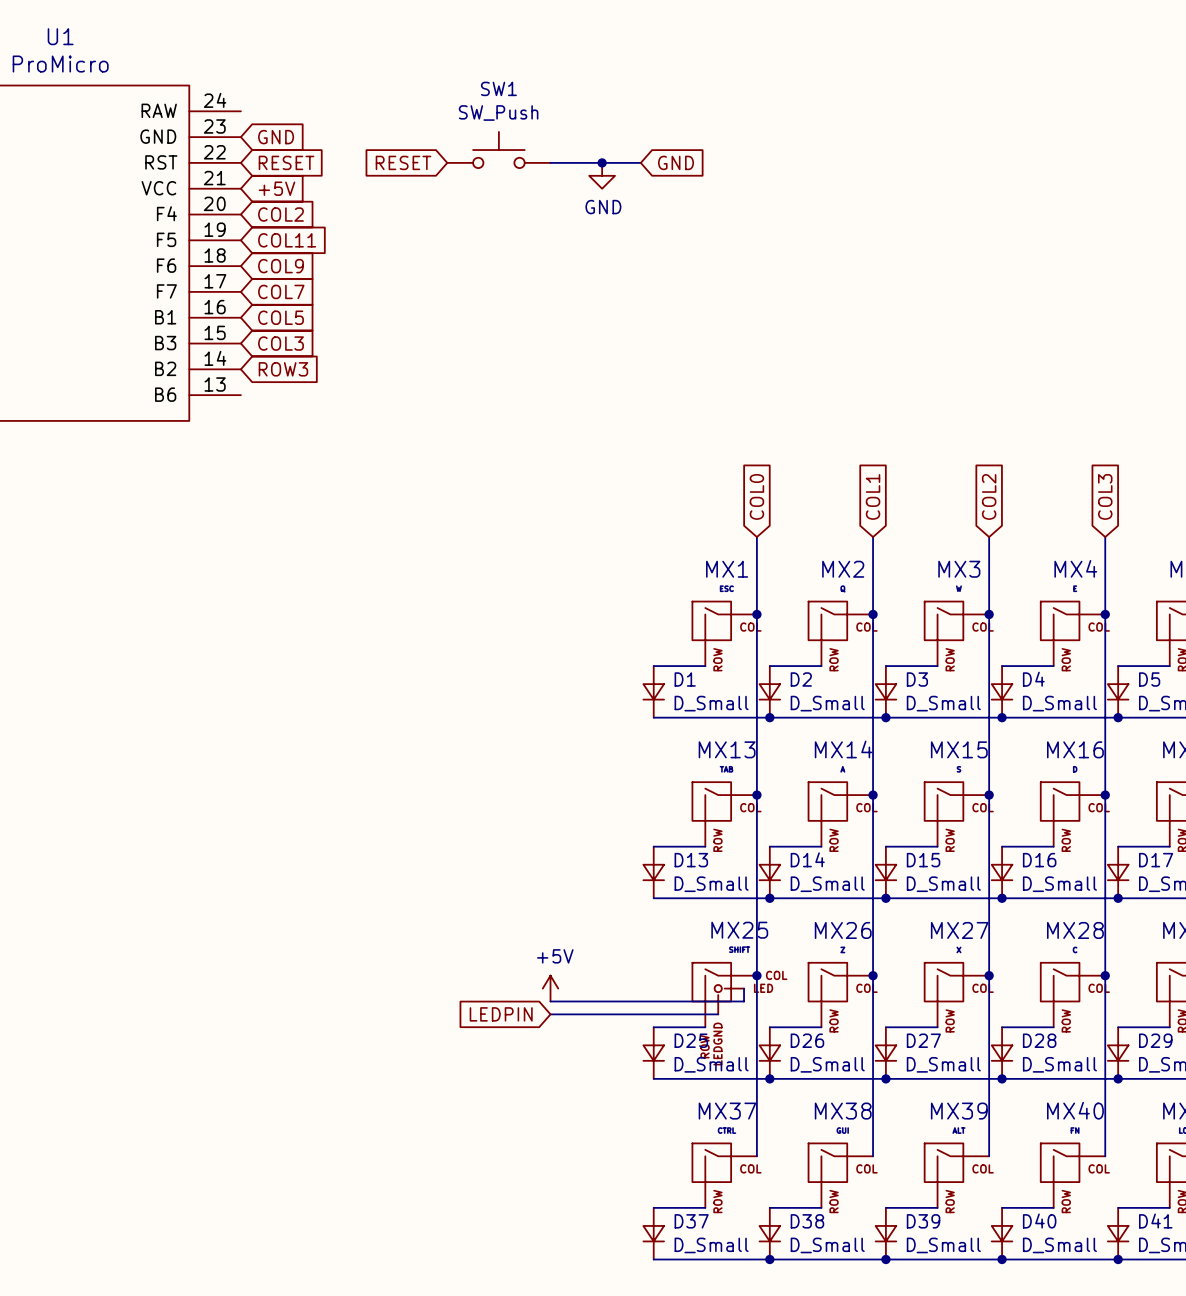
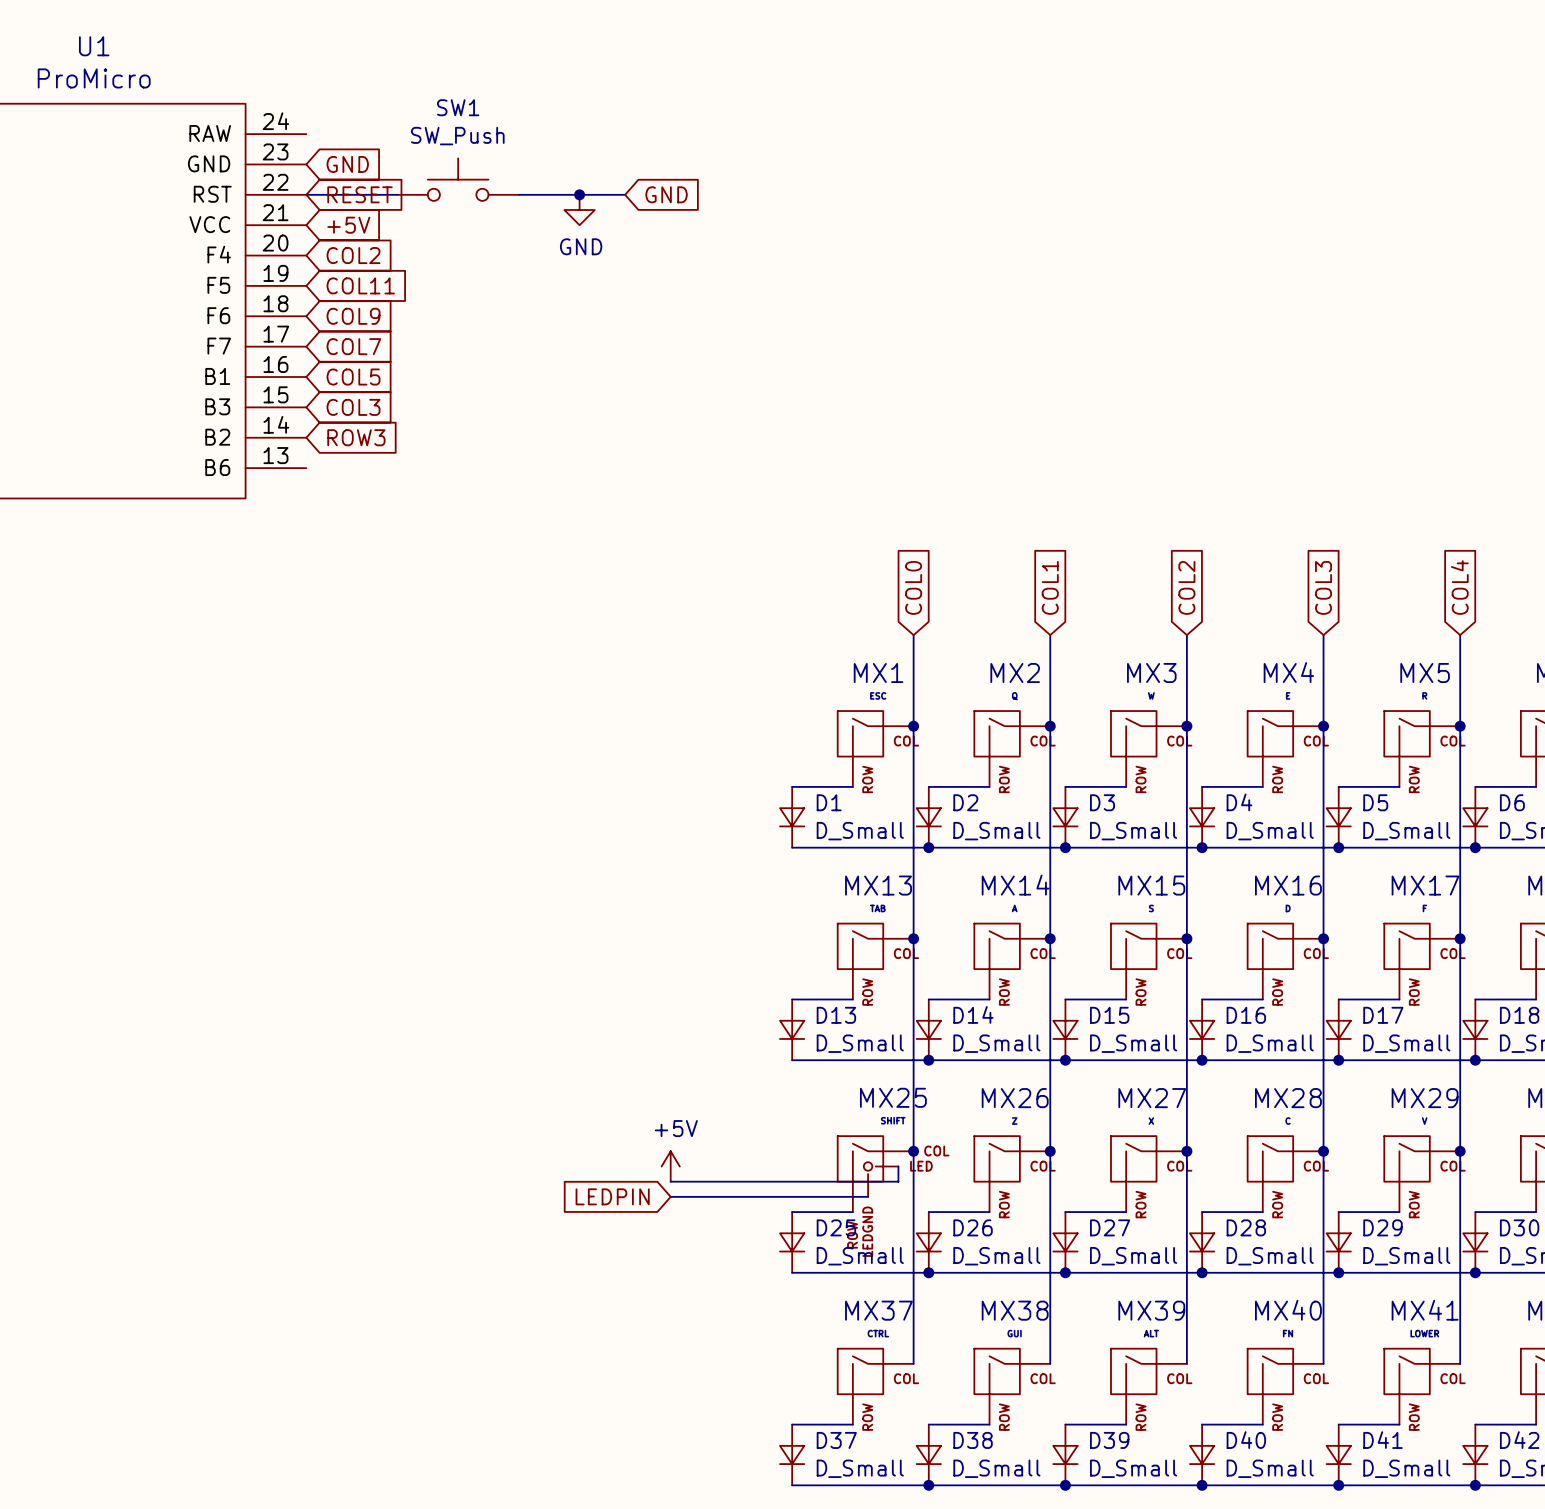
SW1 position: (498, 150) -> (458, 179)
wire: none -> (306, 194) (397, 194)
global label: RESET (403, 162) -> none
junction: none -> (579, 194)
wire: (550, 162) (640, 162) -> (518, 194) (625, 194)
junction: (602, 162) -> none
global label position: GND (676, 162) -> GND (666, 194)
power symbol position: GND (602, 175) -> GND (579, 210)

